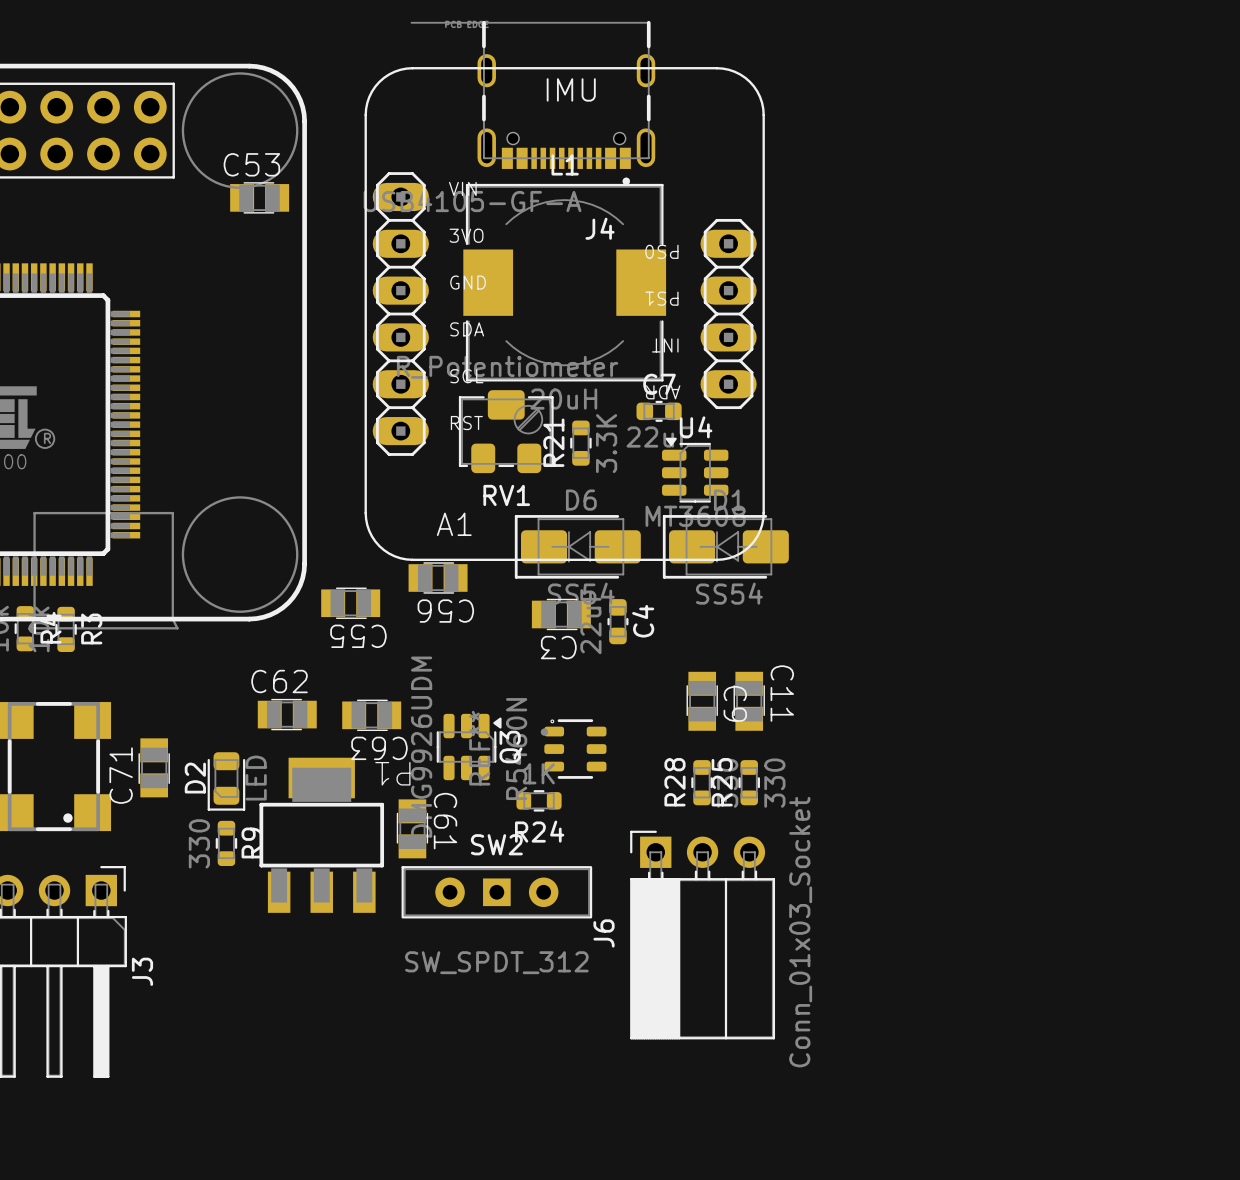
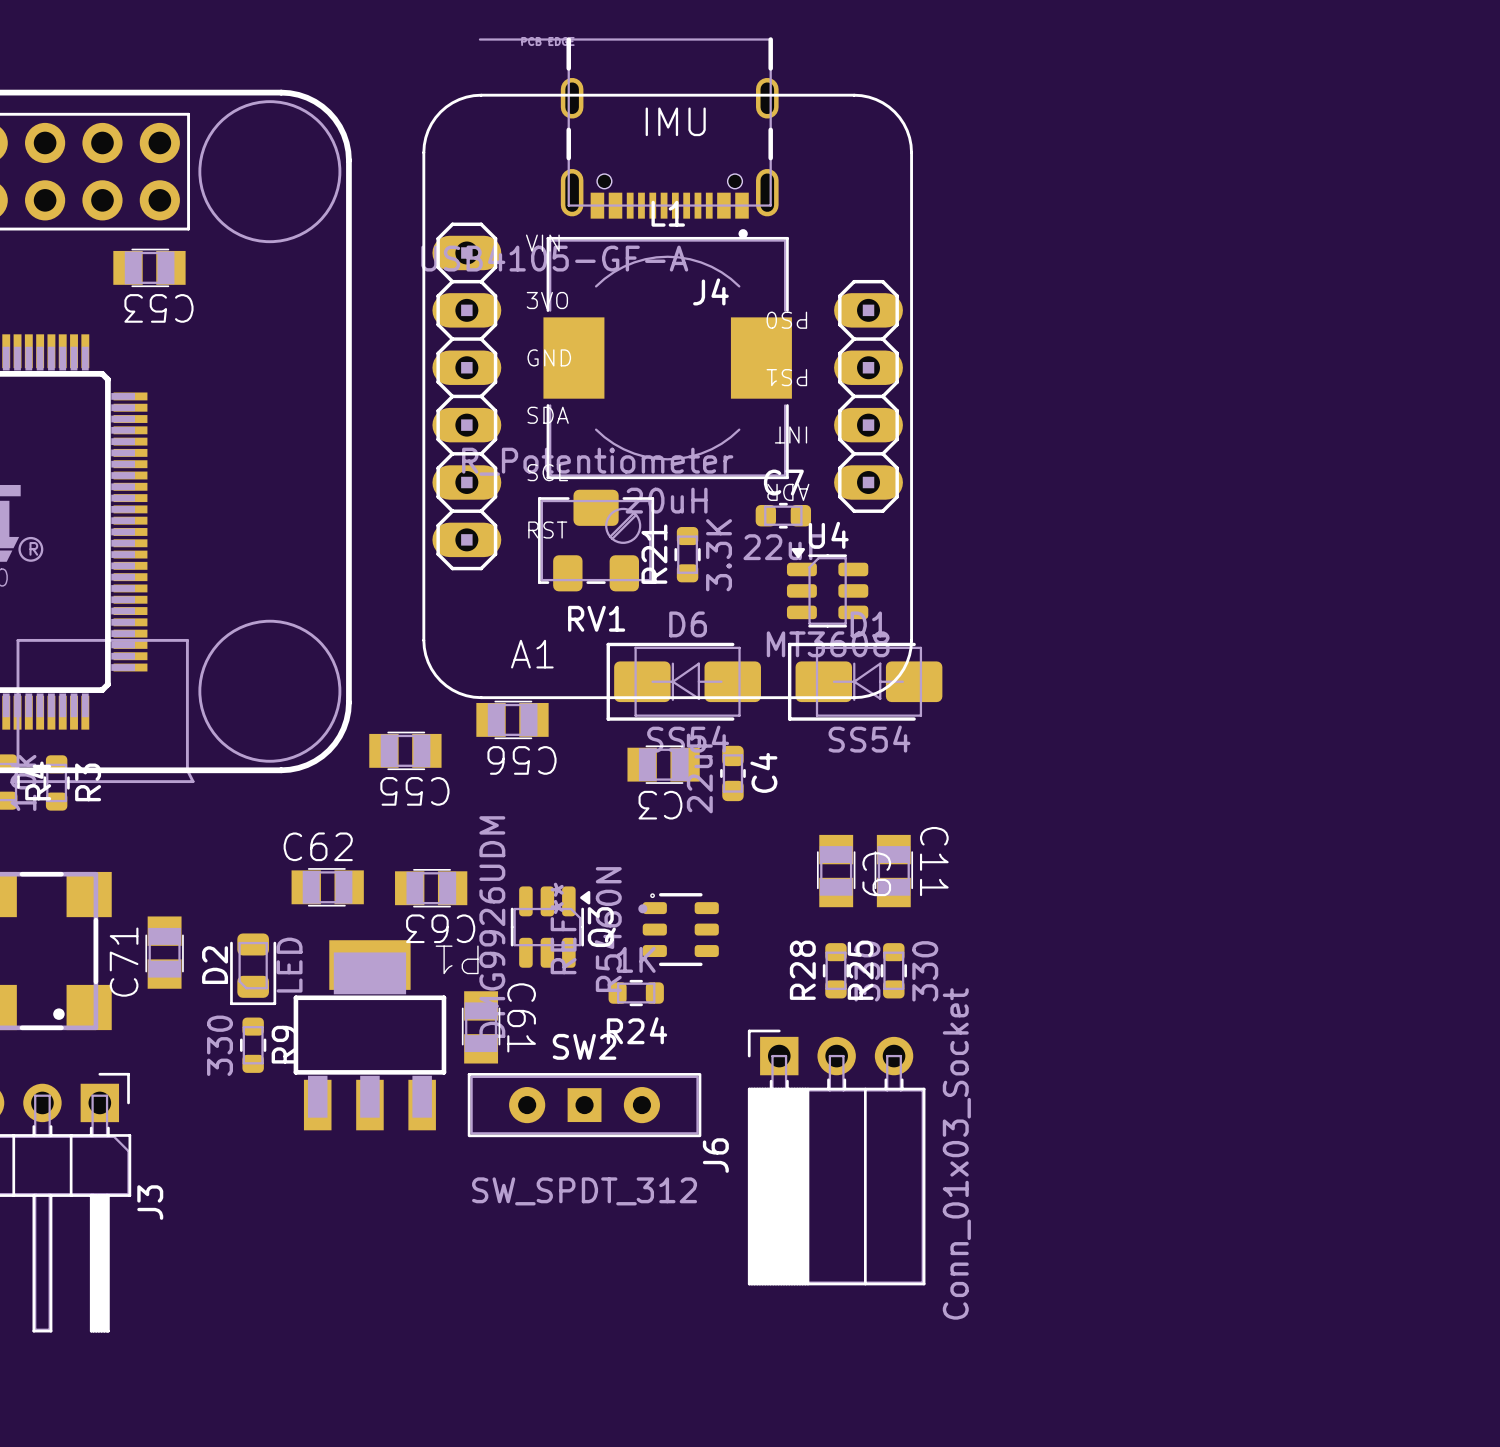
C53 rotation: 0° (259, 197) -> 180° (149, 267)
C53 position: (259, 197) -> (149, 267)

